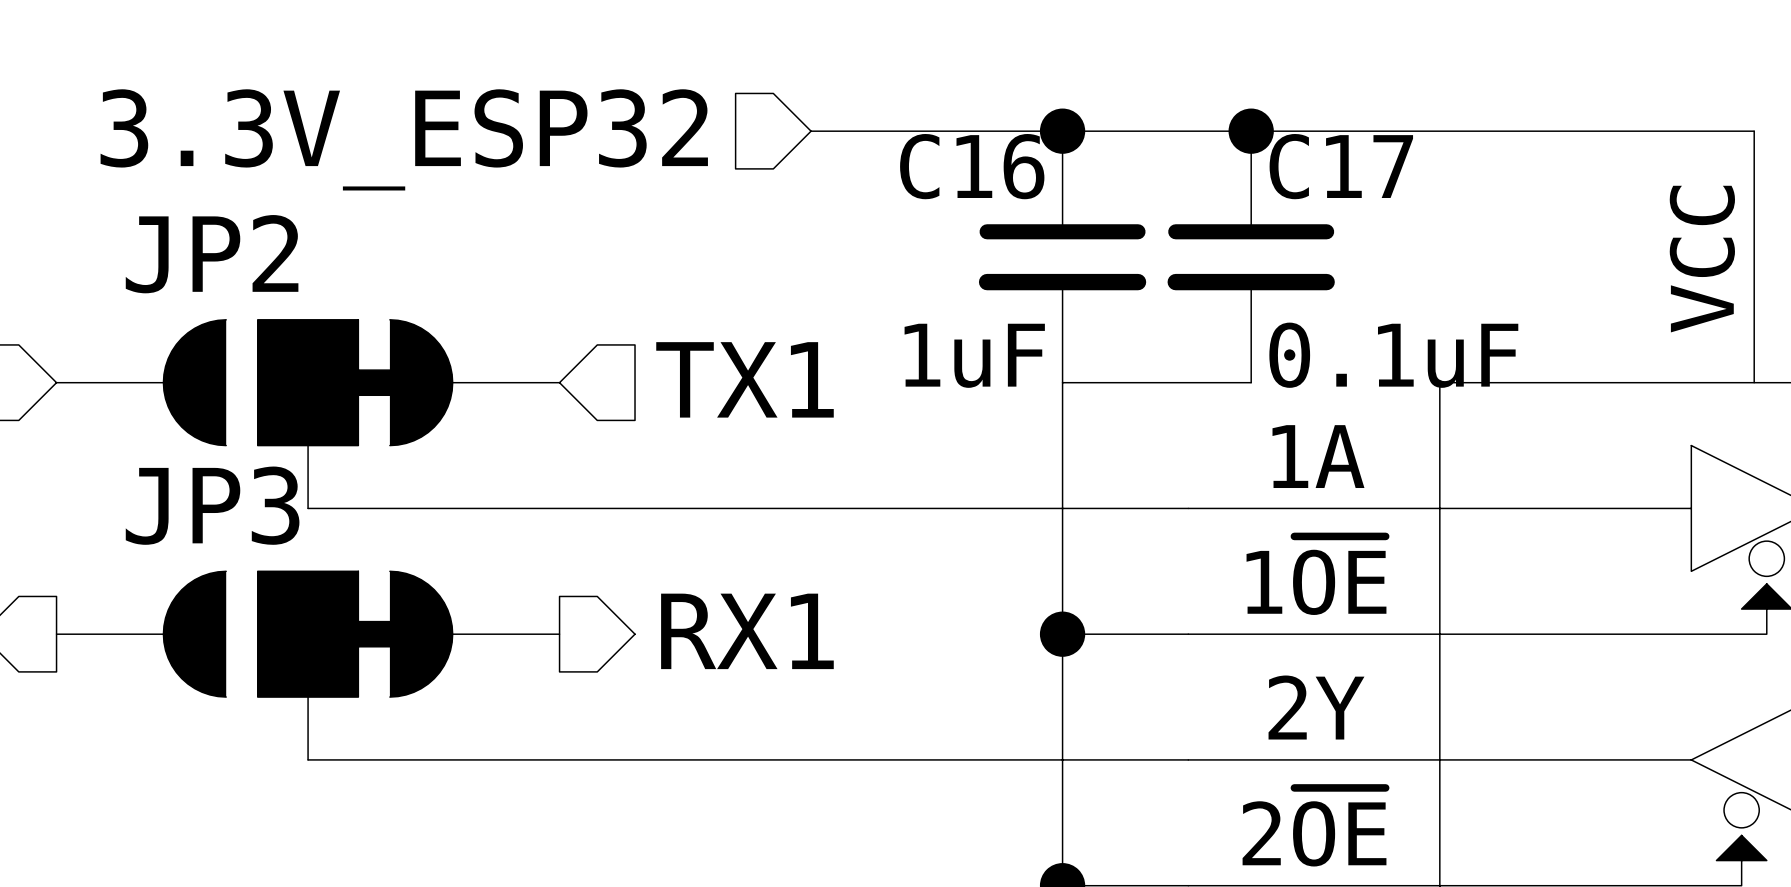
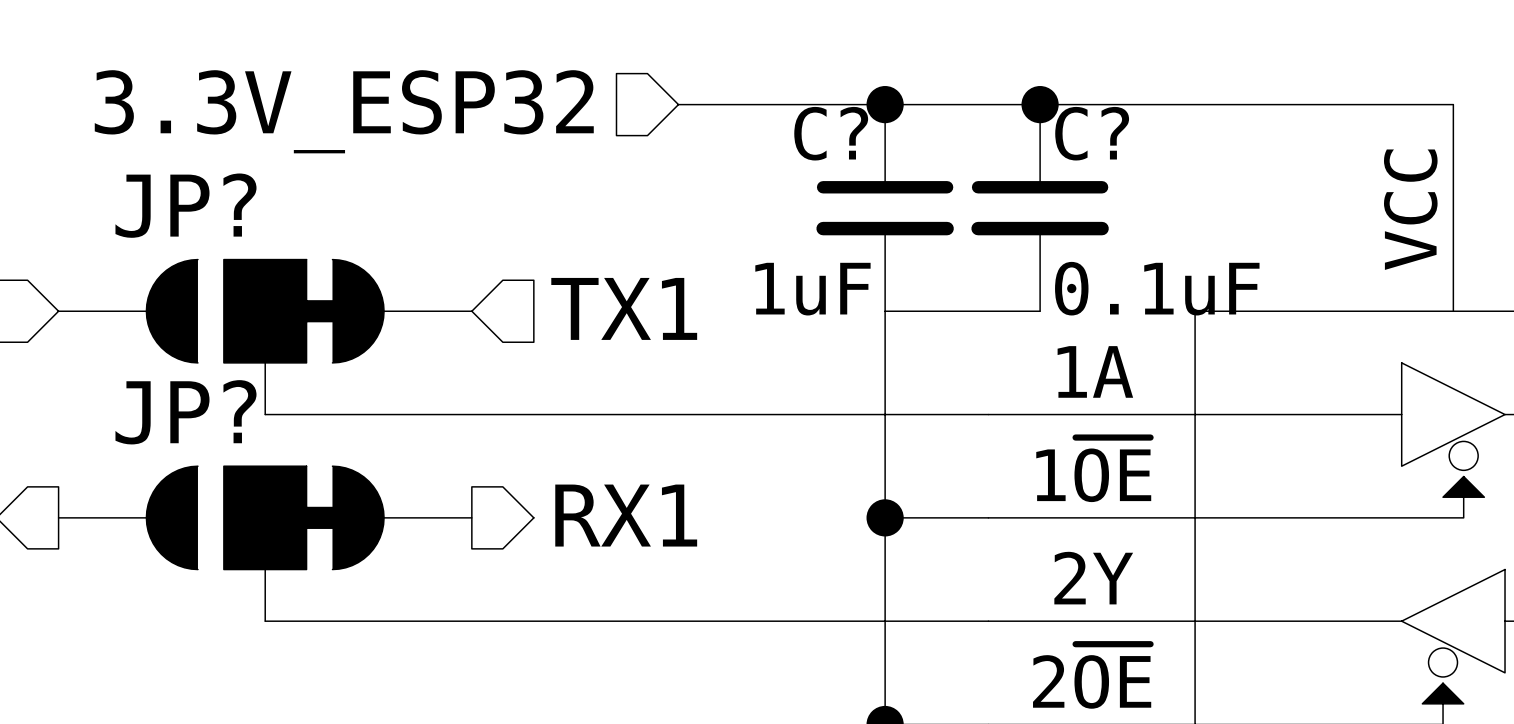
C16 name: C16 (972, 166) -> C? (831, 133)
C17 name: C17 (1341, 166) -> C? (1092, 133)
JP2 name: JP2 (212, 254) -> JP? (185, 205)
JP3 name: JP3 (212, 505) -> JP? (185, 412)

